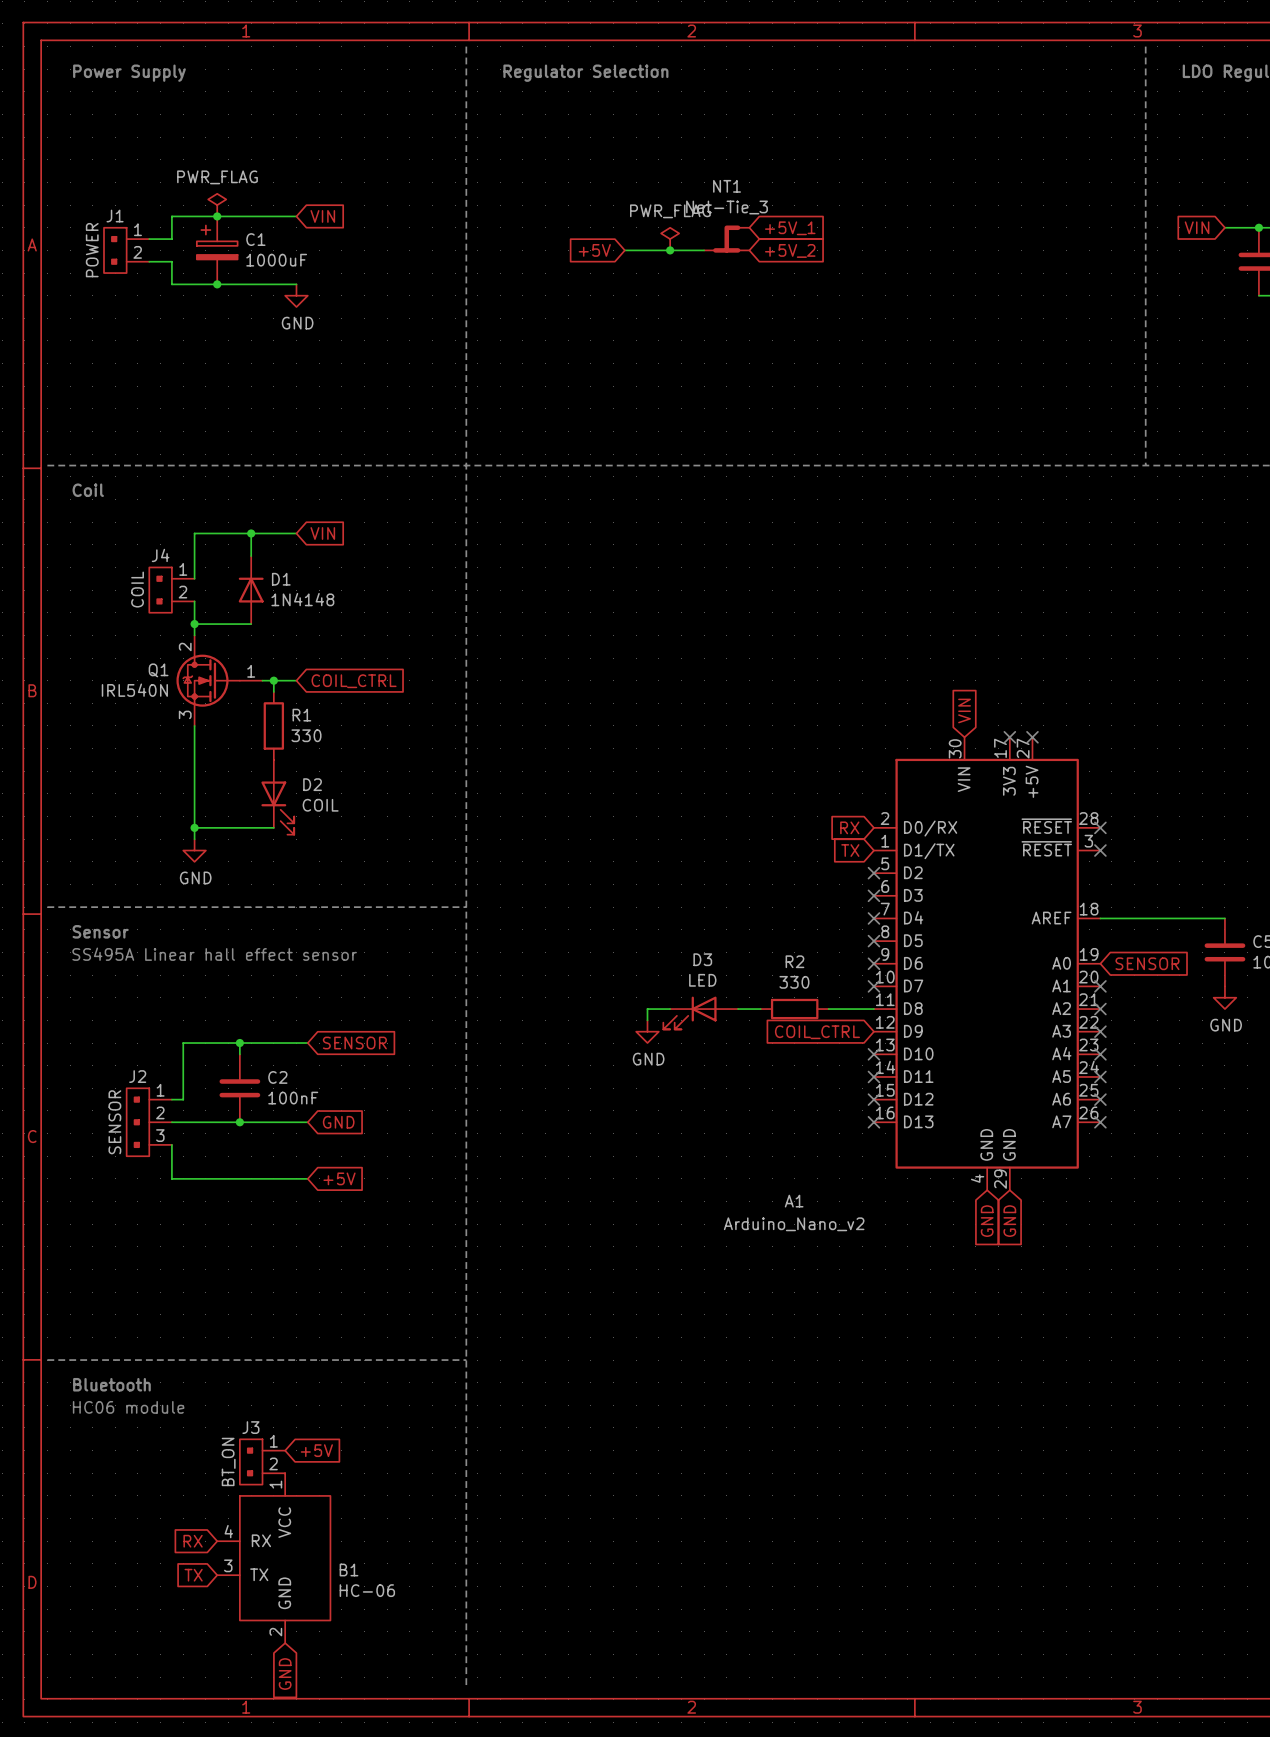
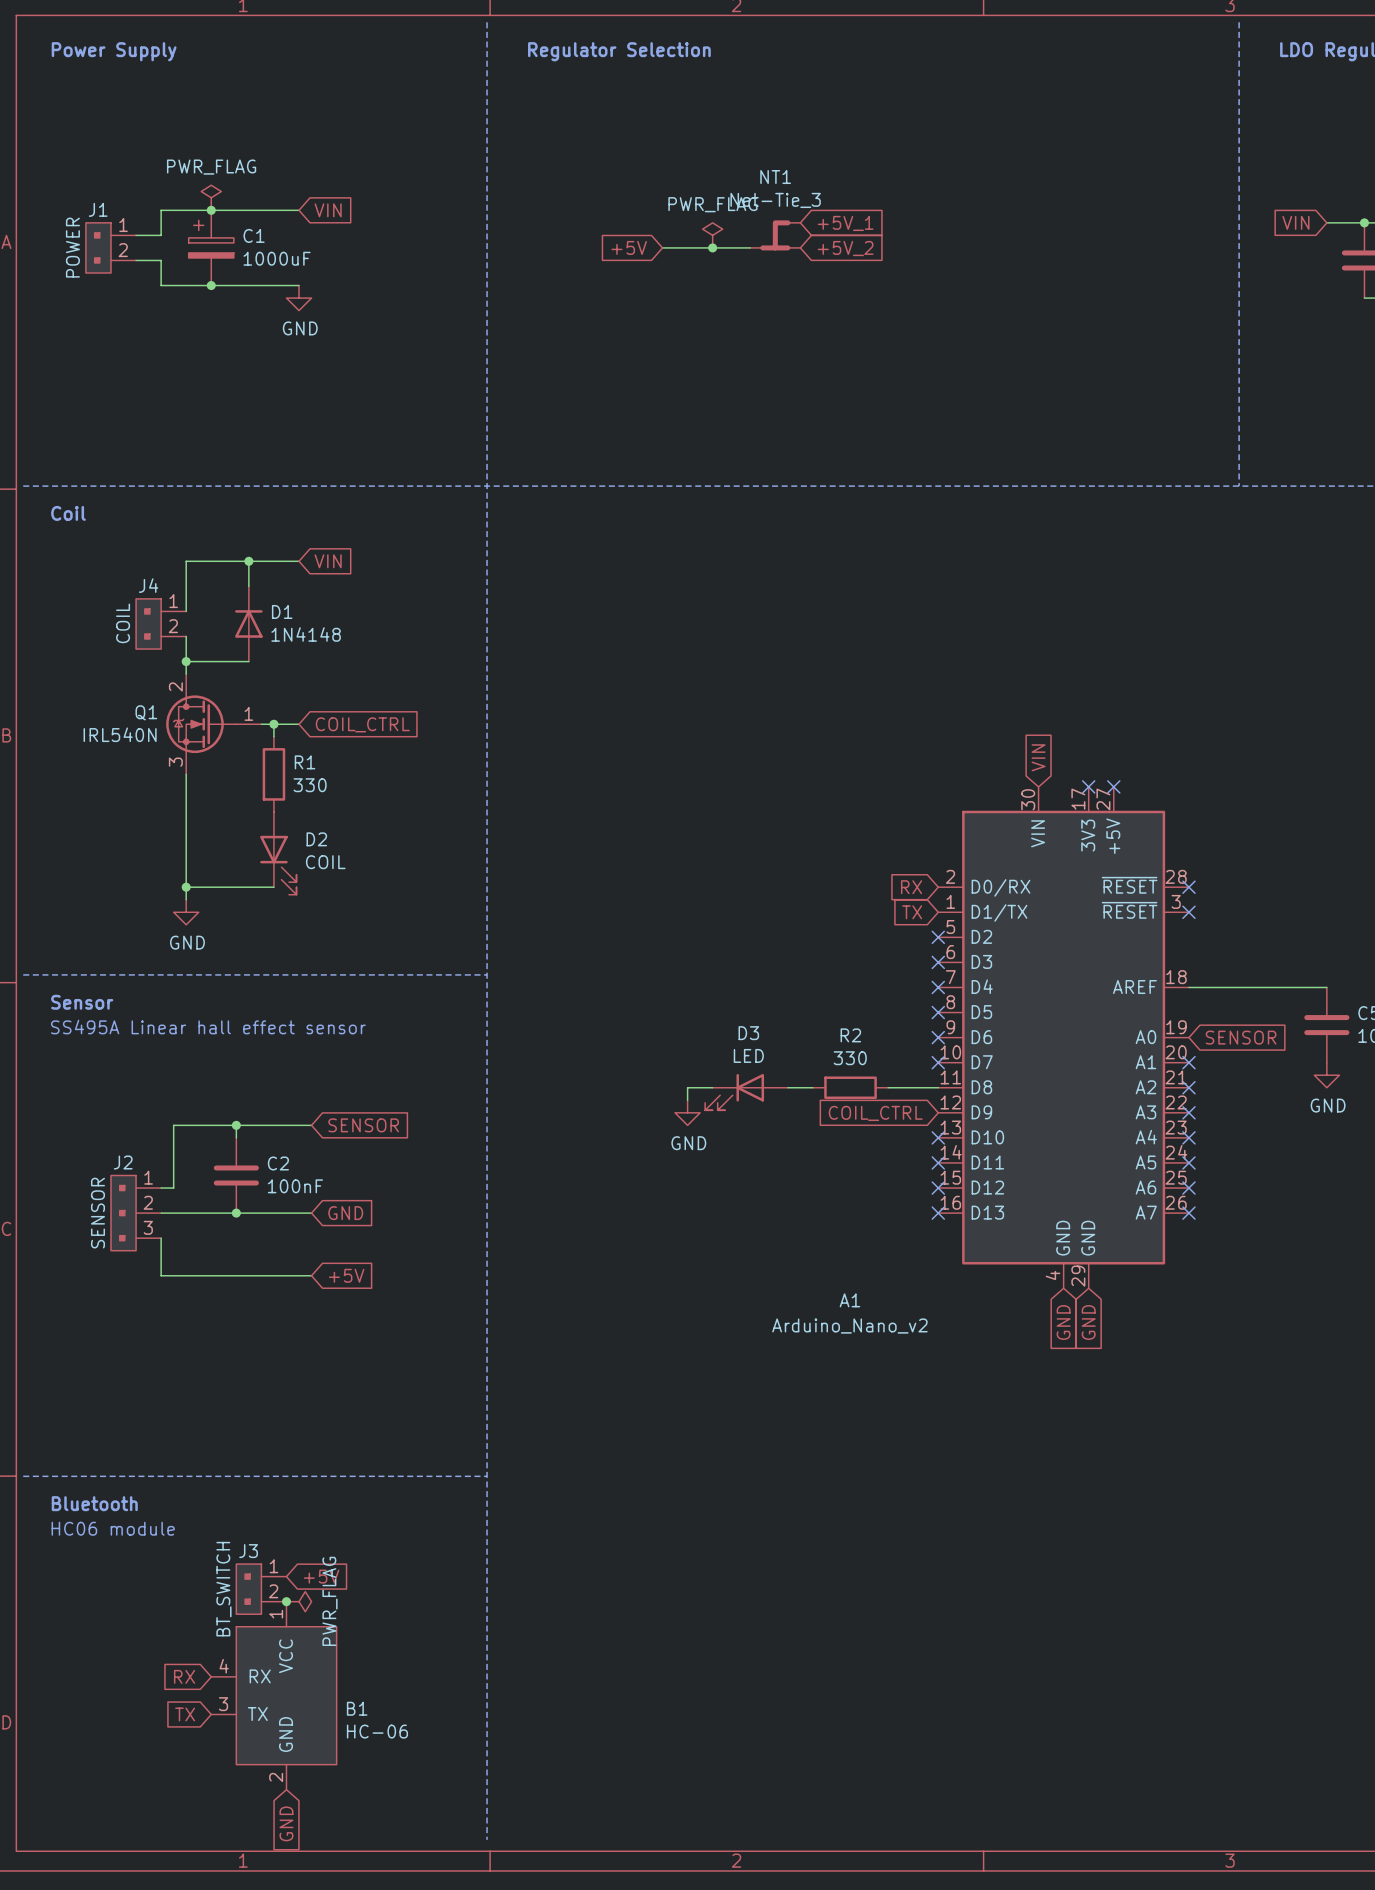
J3 value: BT_ON (228, 1461) -> BT_SWITCH (223, 1589)
junction: none -> (286, 1601)
power symbol: none -> PWR_FLAG (299, 1601)

